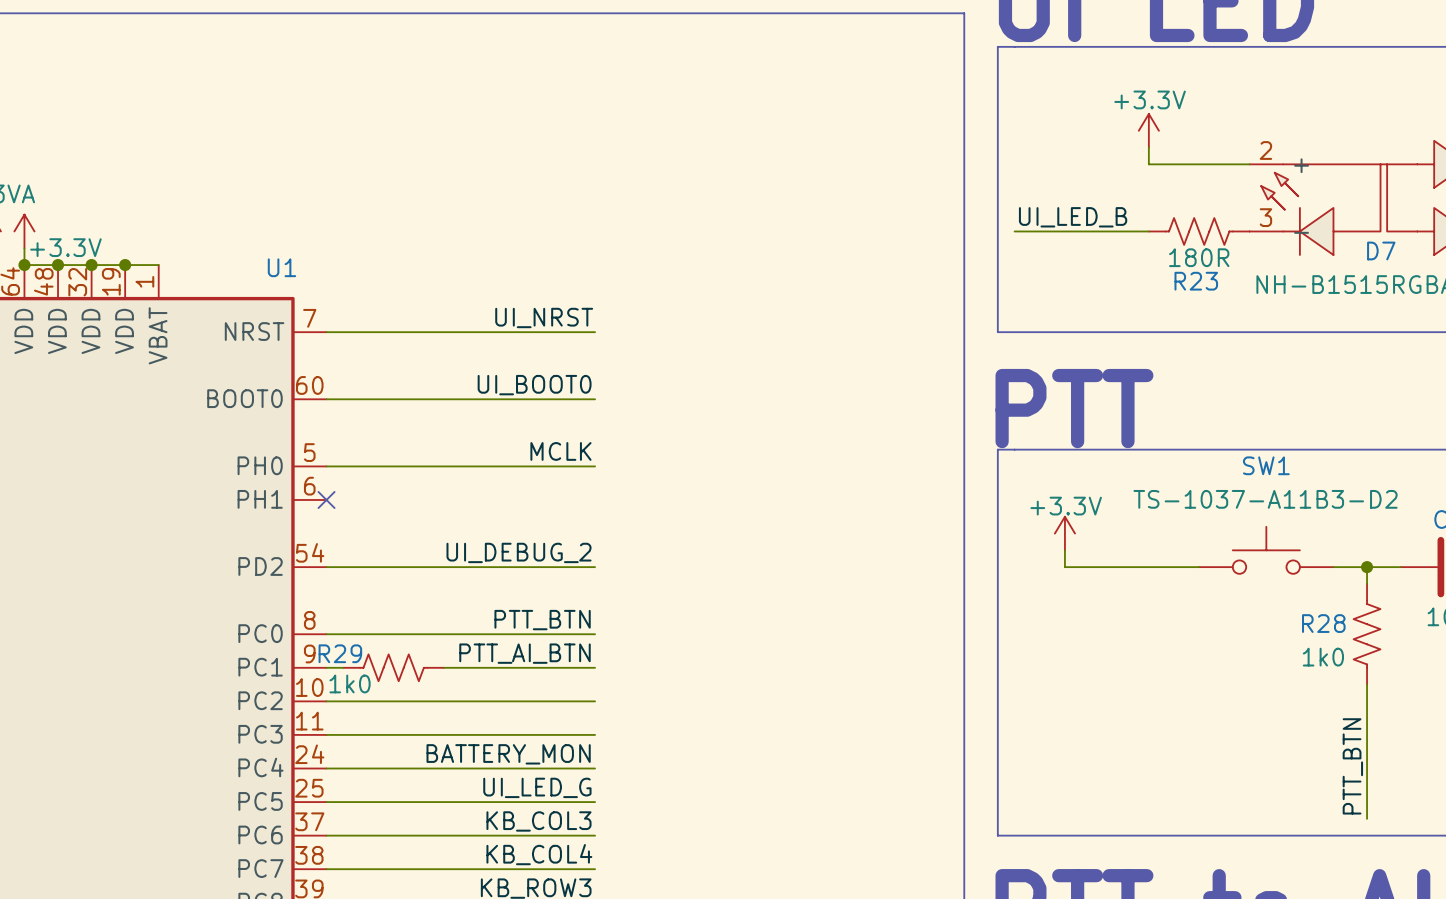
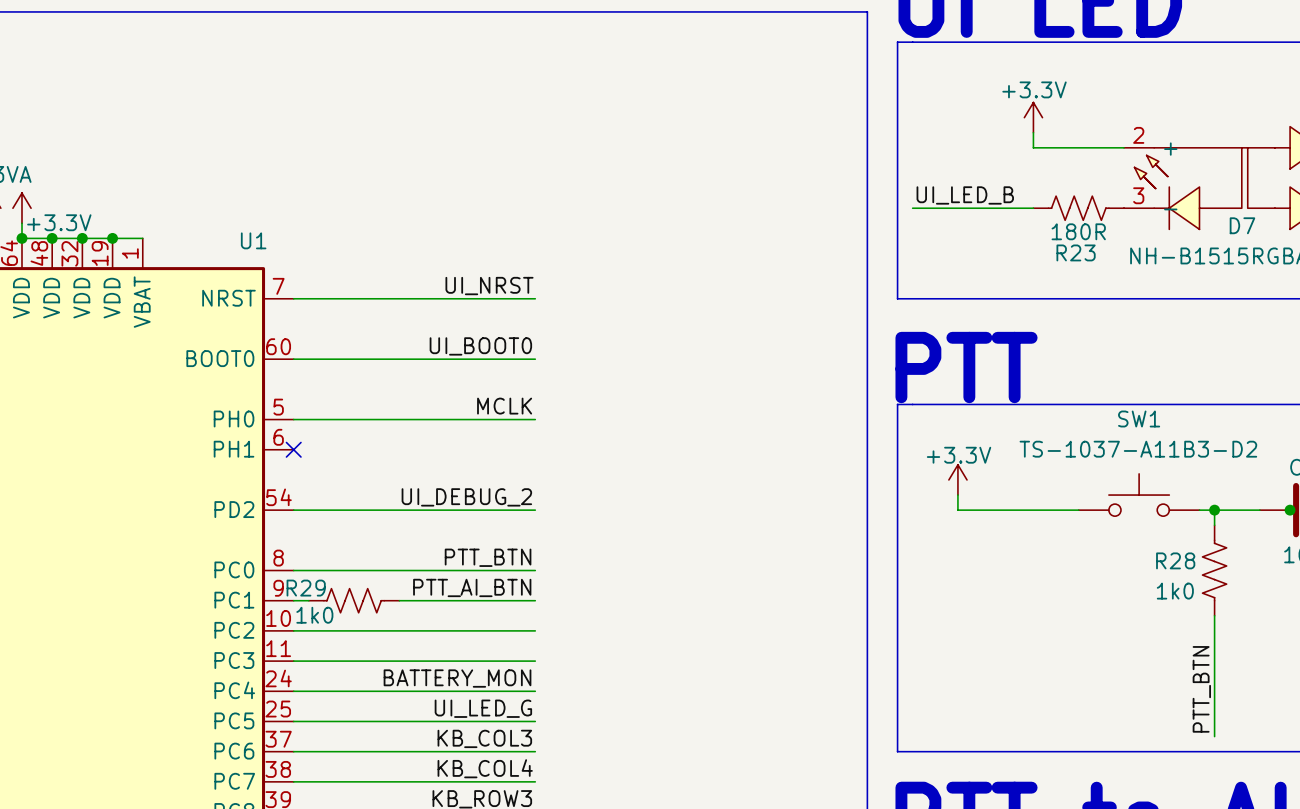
wire: (1367, 567) (1367, 583) -> (1214, 510) (1214, 525)
junction position: (1367, 567) -> (1214, 510)
junction: none -> (1290, 510)
R28 position: (1367, 634) -> (1214, 570)
wire: (1367, 684) (1367, 818) -> (1214, 615) (1214, 736)
label position: PTT_BTN (1352, 766) -> PTT_BTN (1201, 689)

